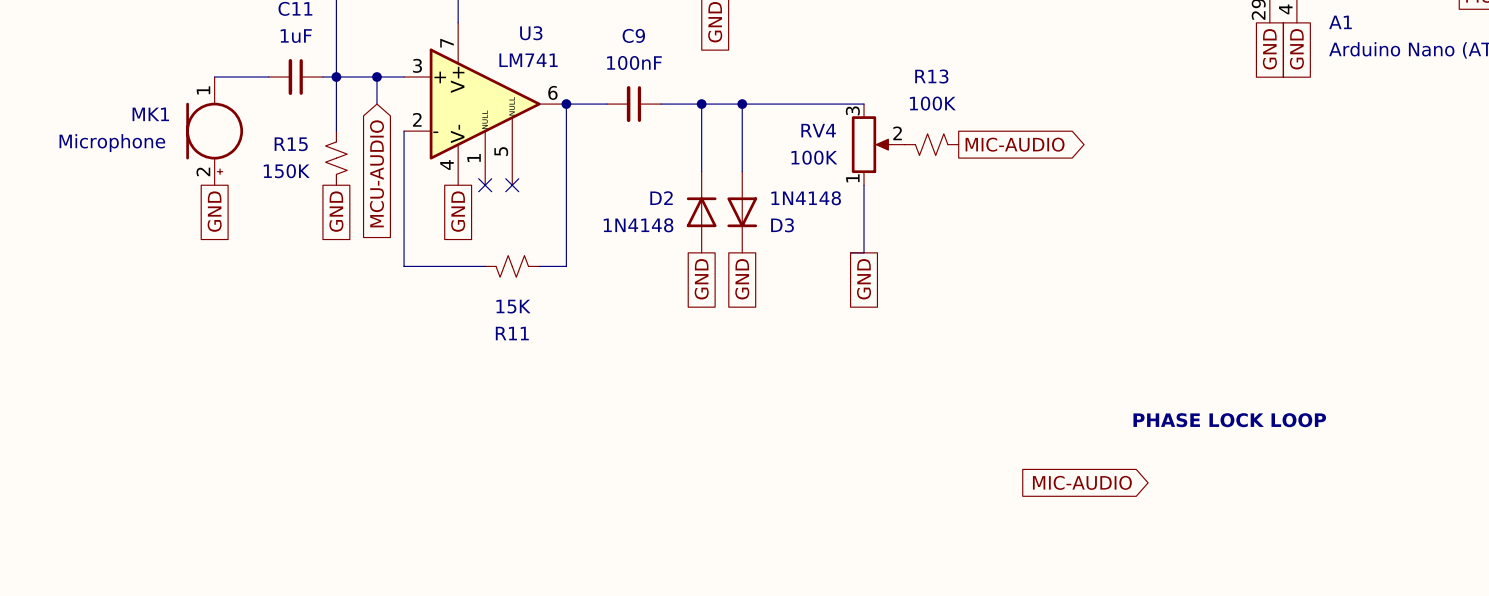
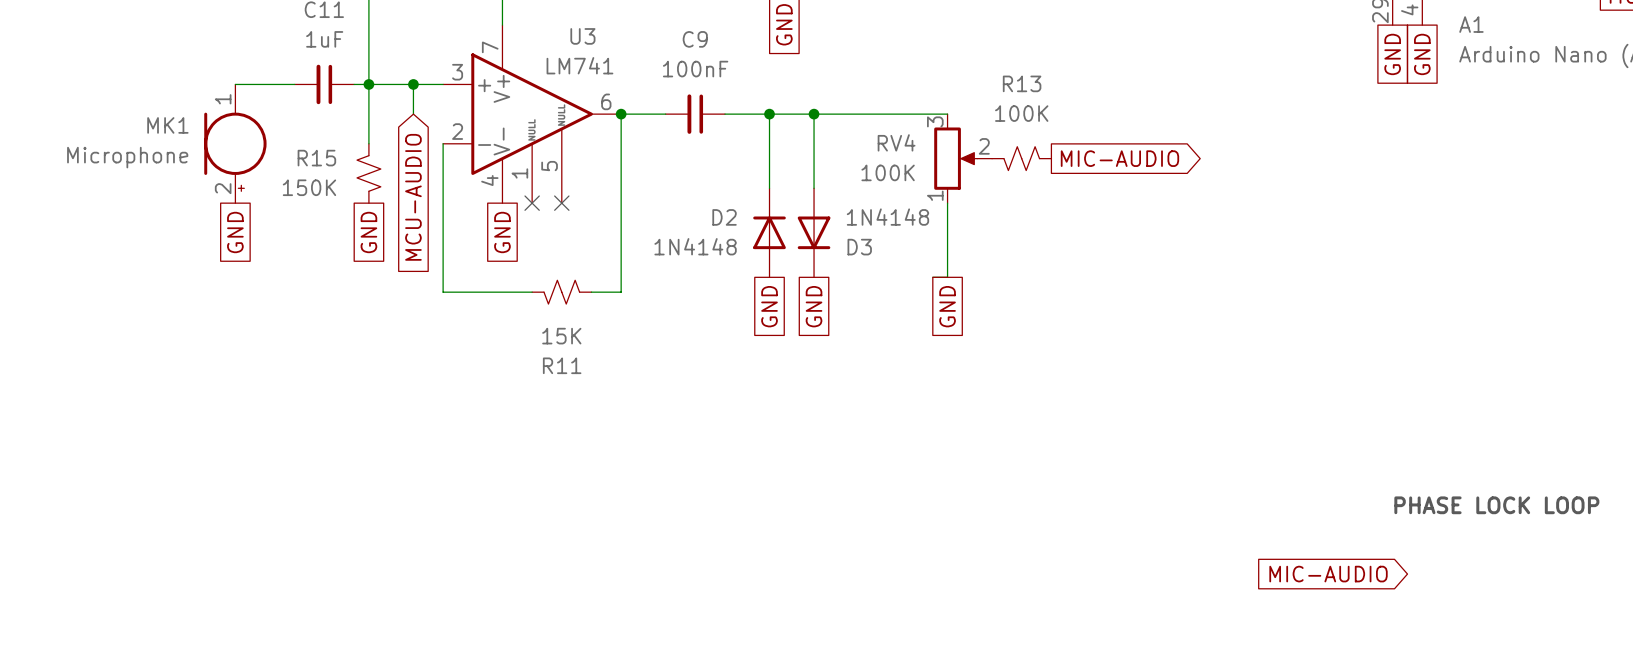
text position: PHASE LOCK LOOP (1229, 420) -> PHASE LOCK LOOP (1496, 505)
global label position: MIC-AUDIO (1082, 482) -> MIC-AUDIO (1328, 574)

